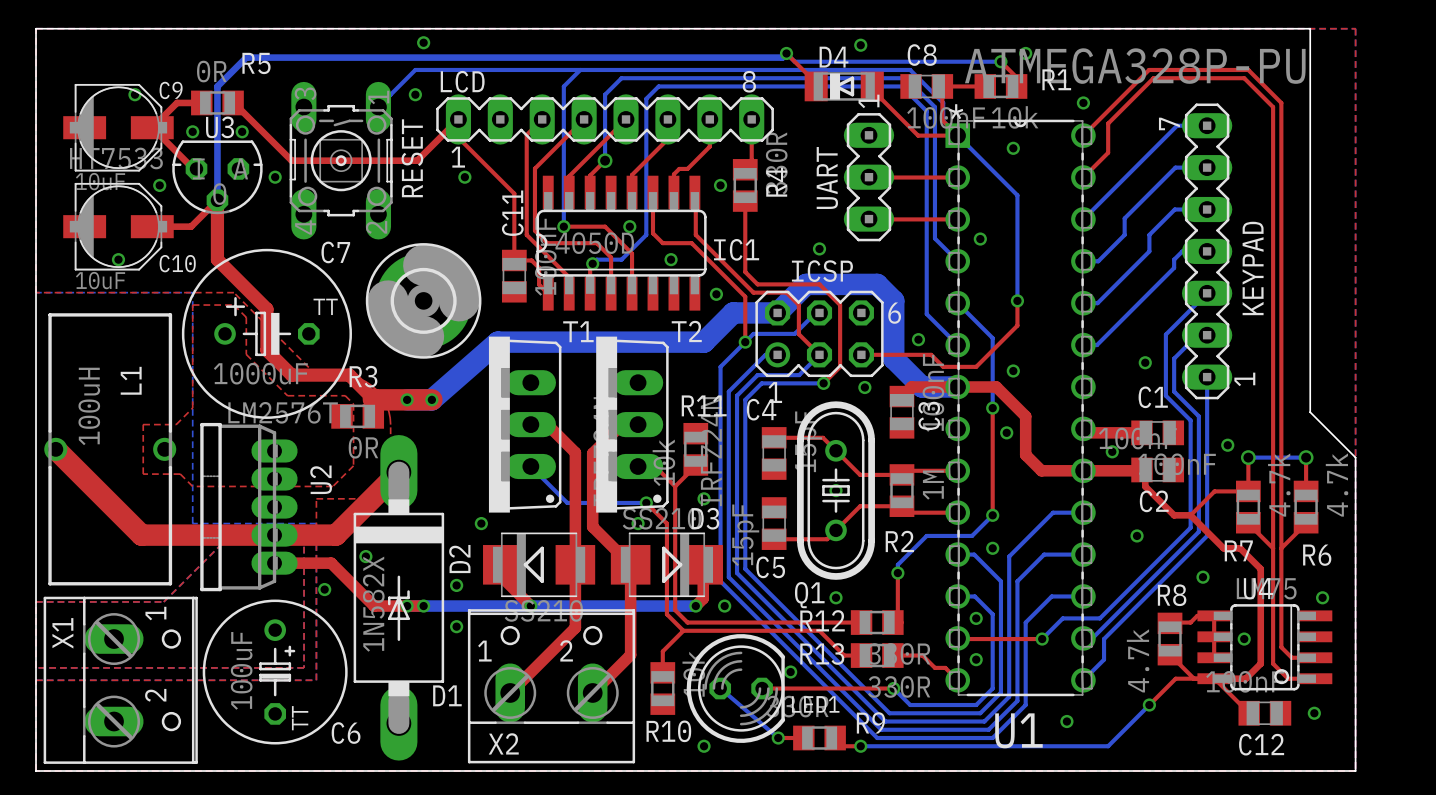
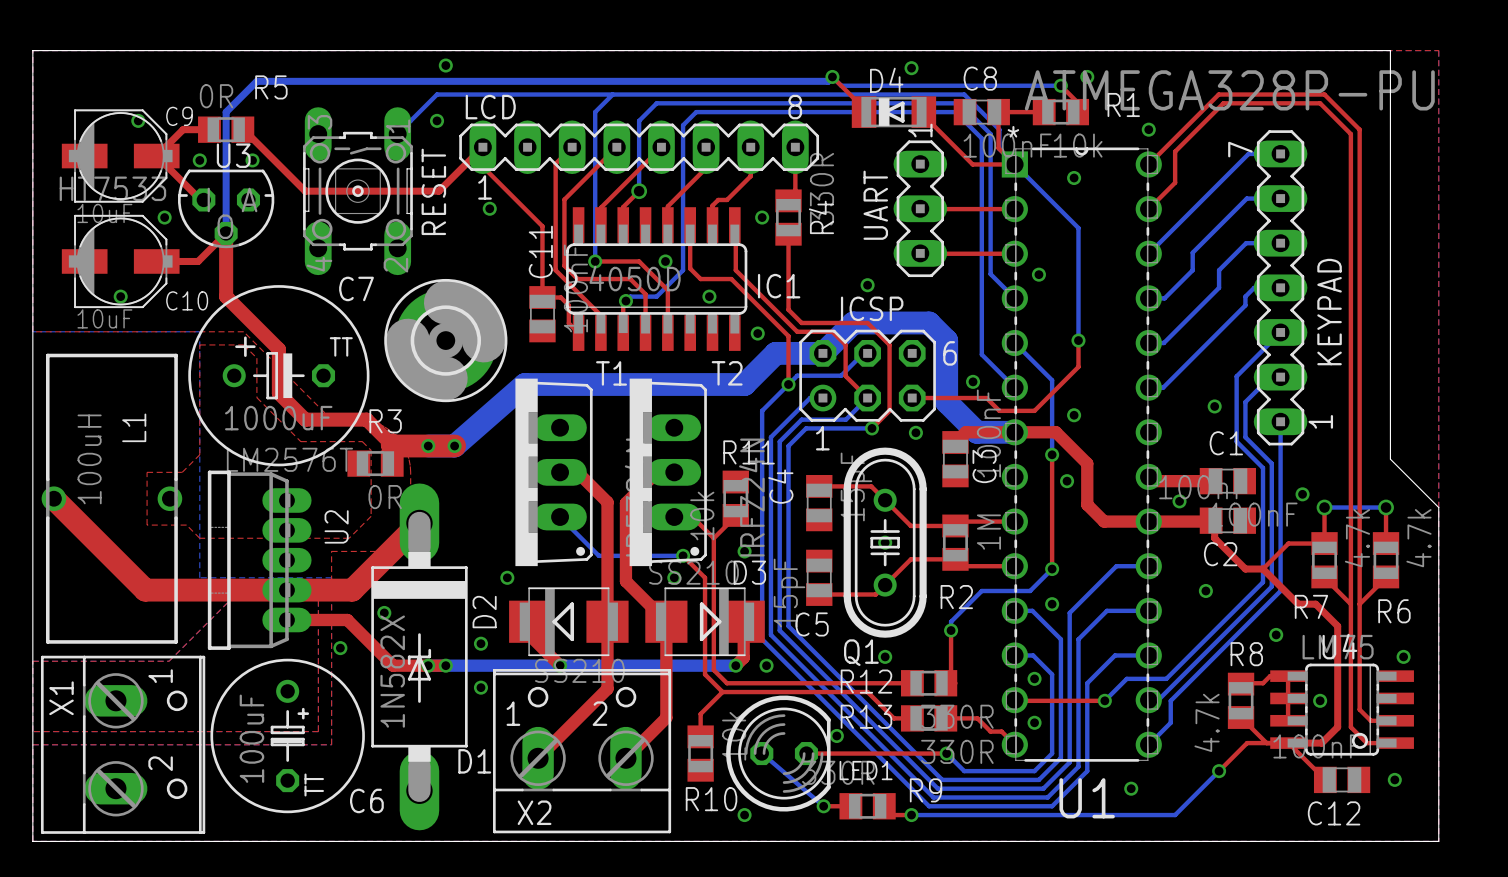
via: (275, 177) -> none
C4 name rotation: 0° (761, 409) -> 90° counterclockwise (780, 486)

